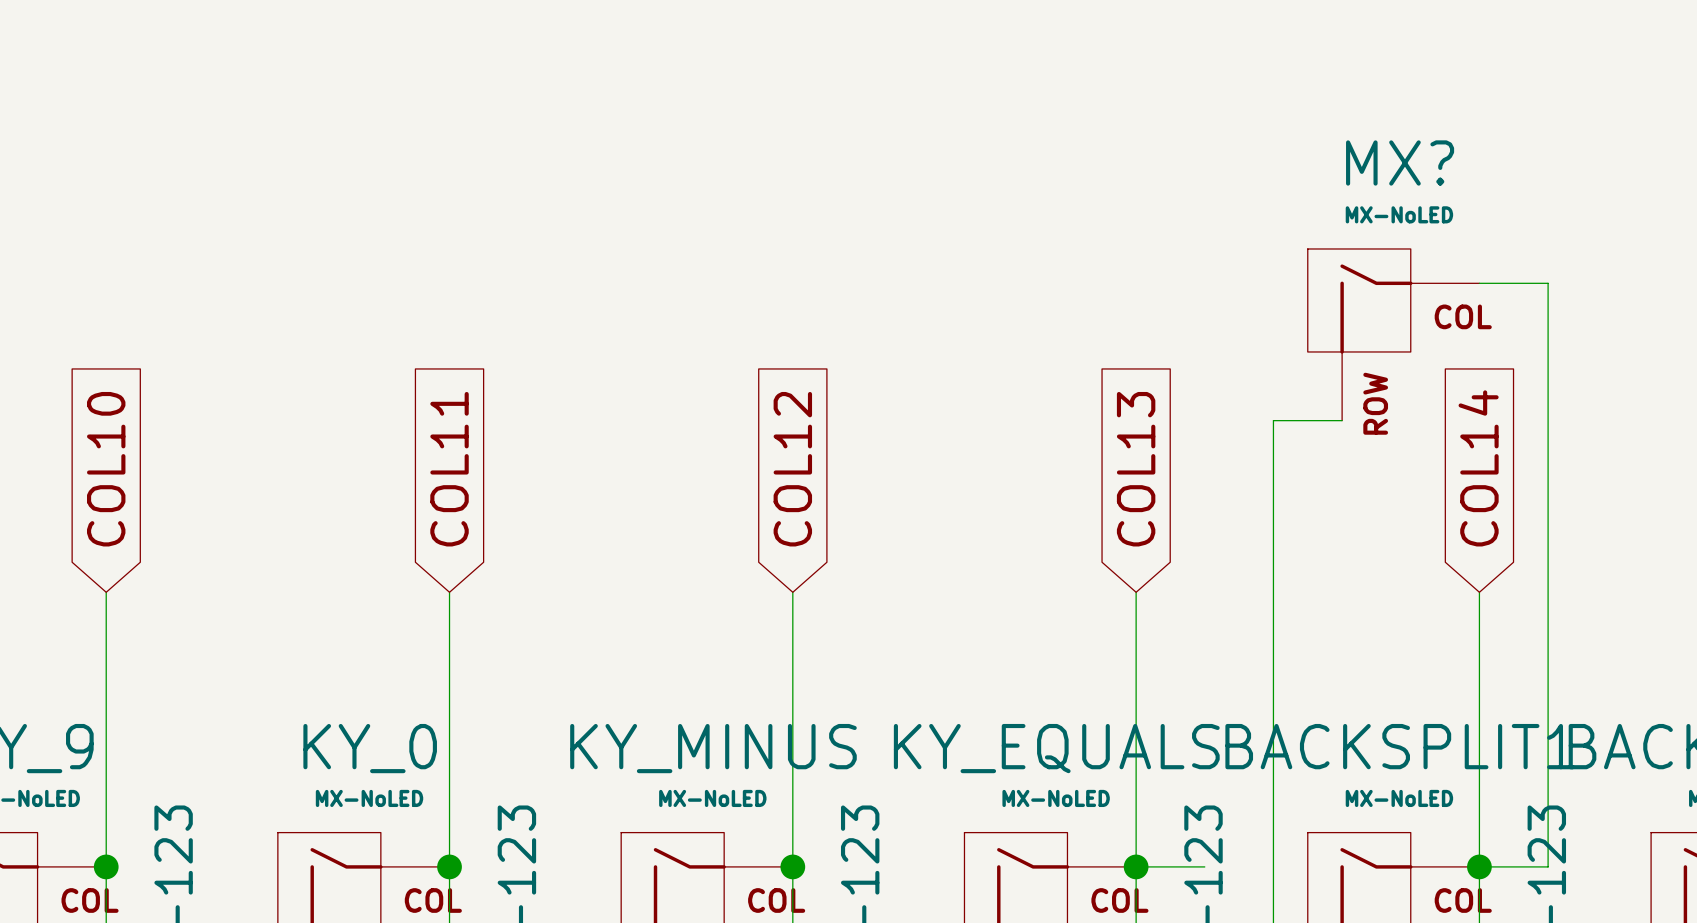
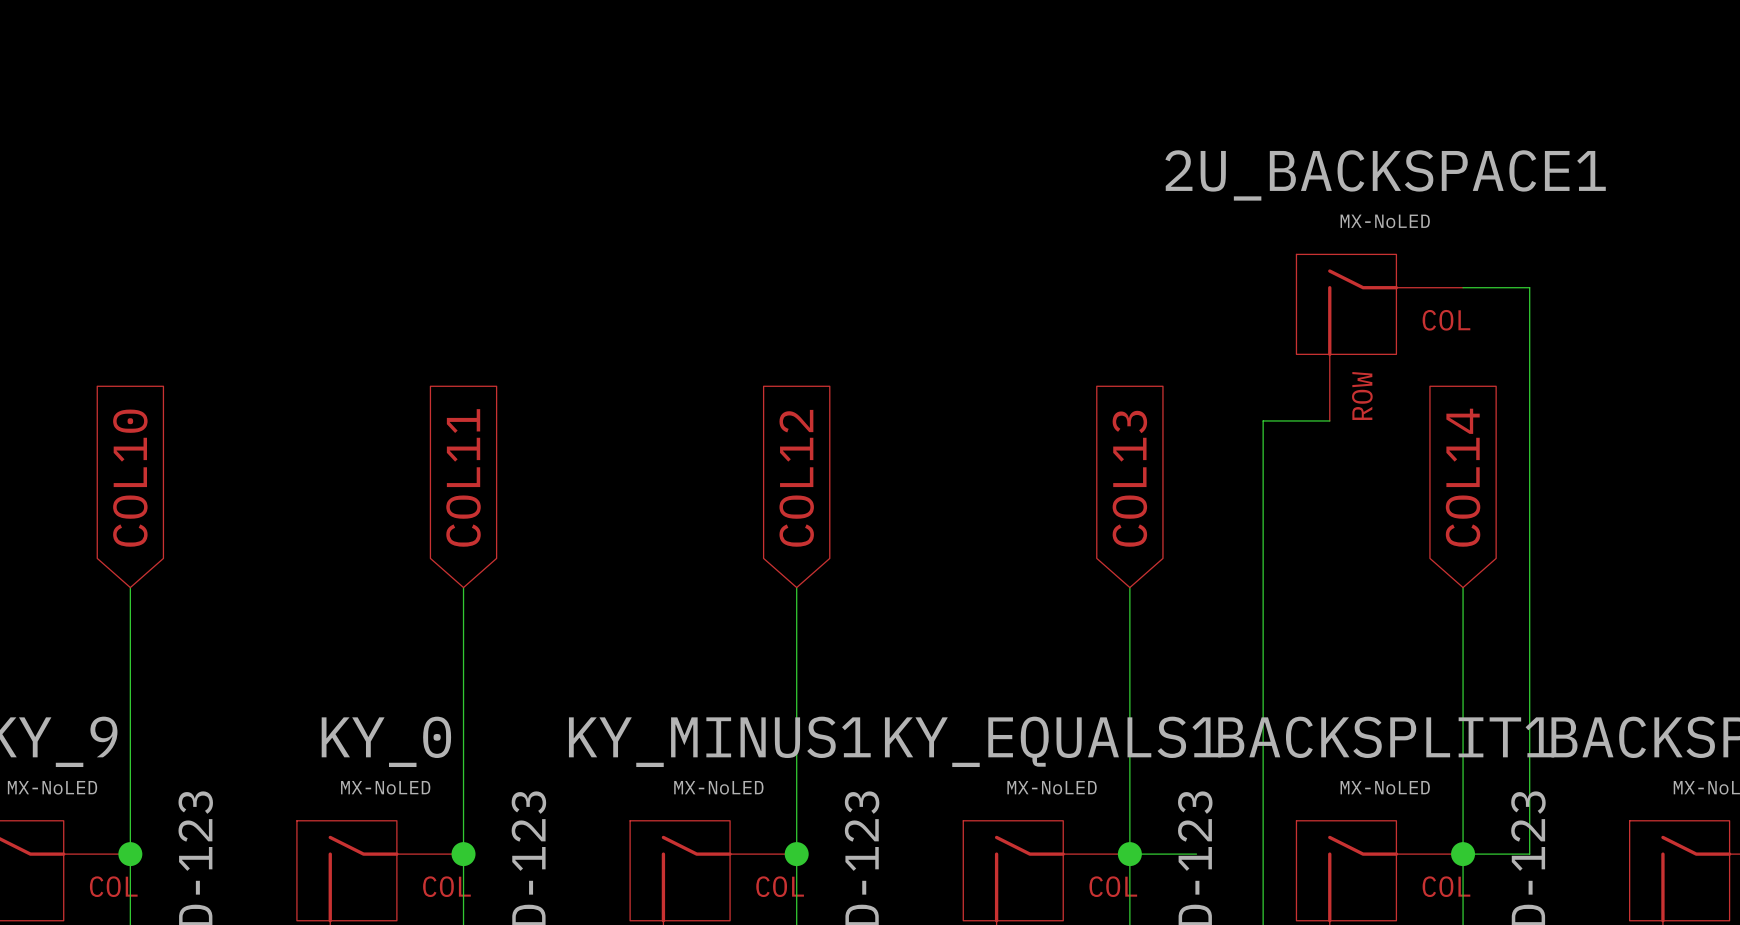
MX? name: MX? (1400, 163) -> 2U_BACKSPACE1 (1385, 175)
KY_MINUS name: KY_MINUS (713, 748) -> KY_MINUS1 (719, 741)
KY_EQUALS name: KY_EQUALS (1056, 748) -> KY_EQUALS1 (1053, 741)

